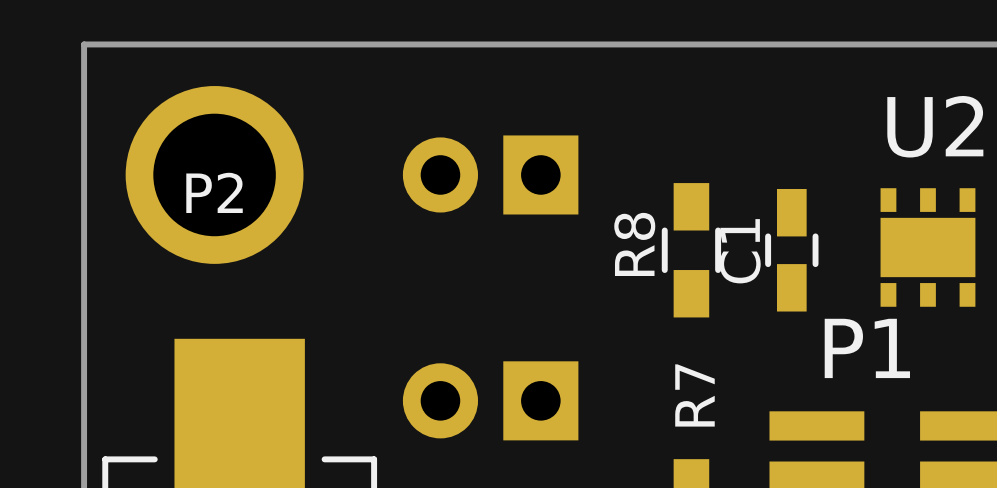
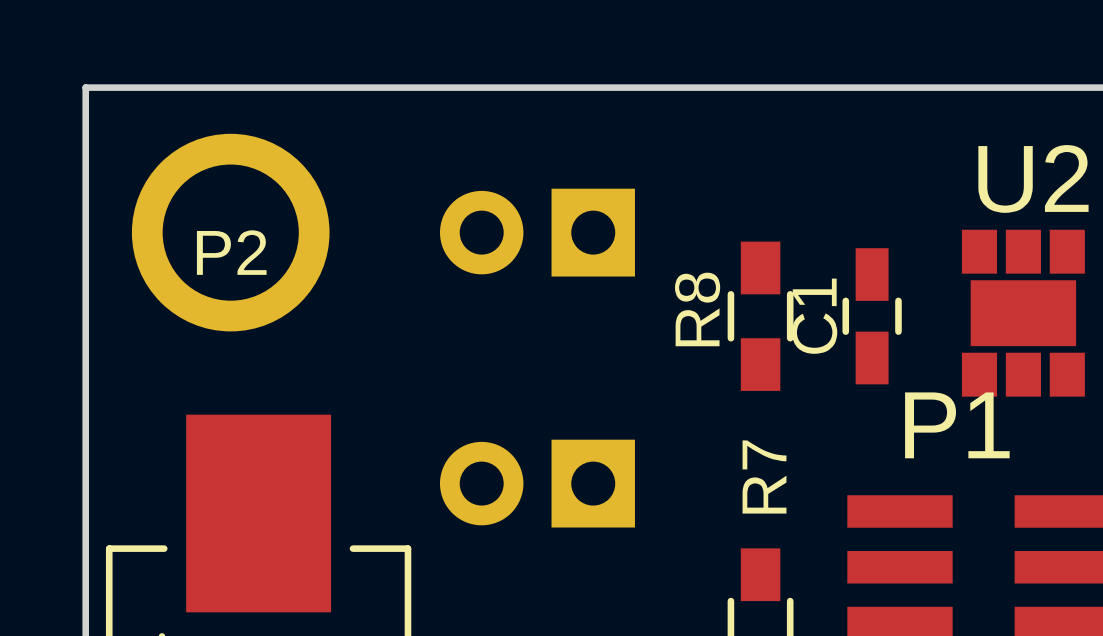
U2 footprint: [880, 188, 976, 307] -> [961, 229, 1085, 397]

